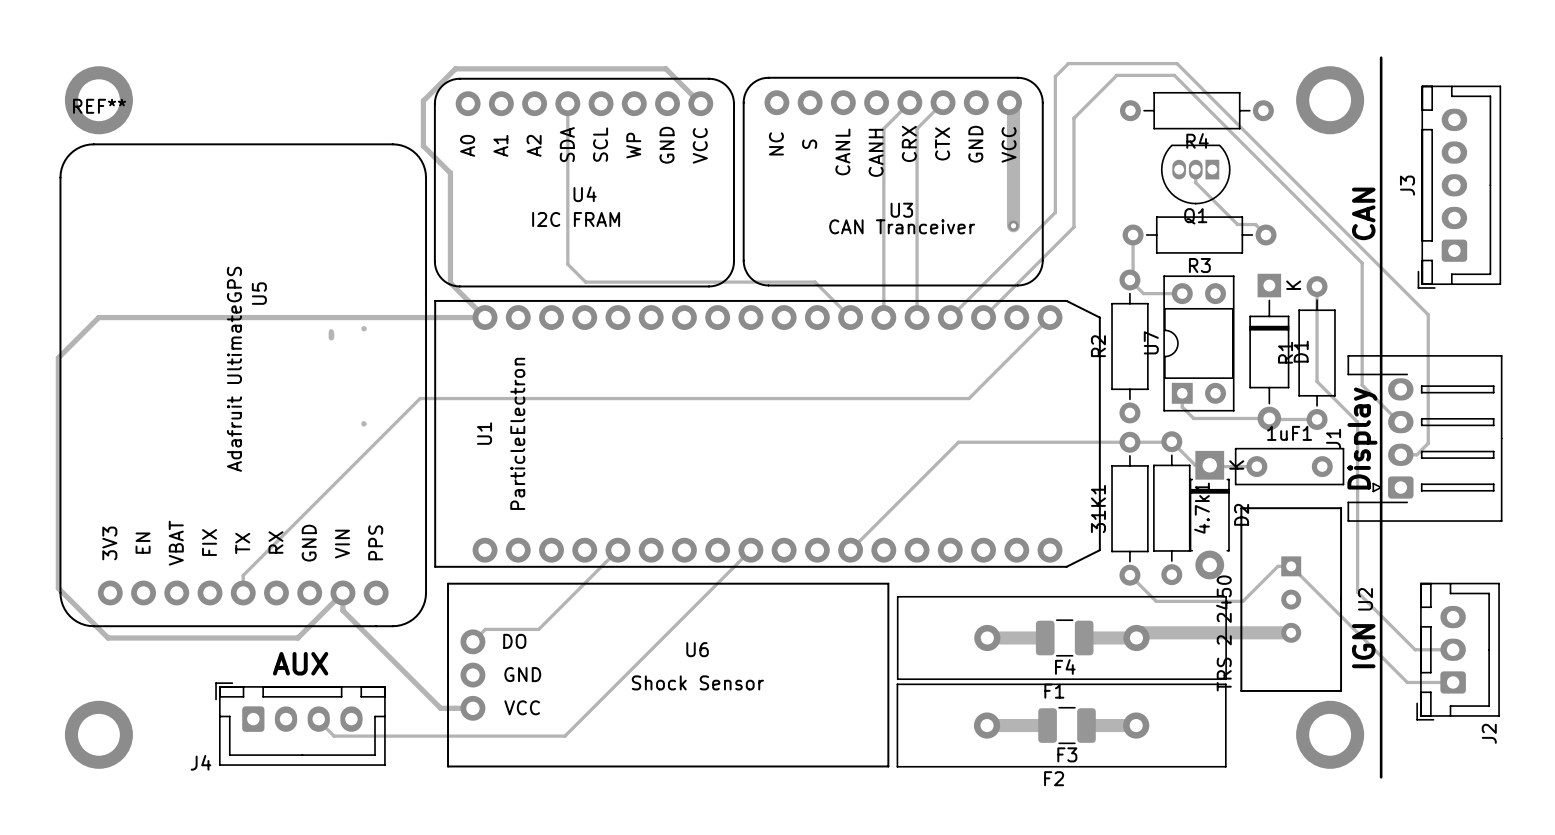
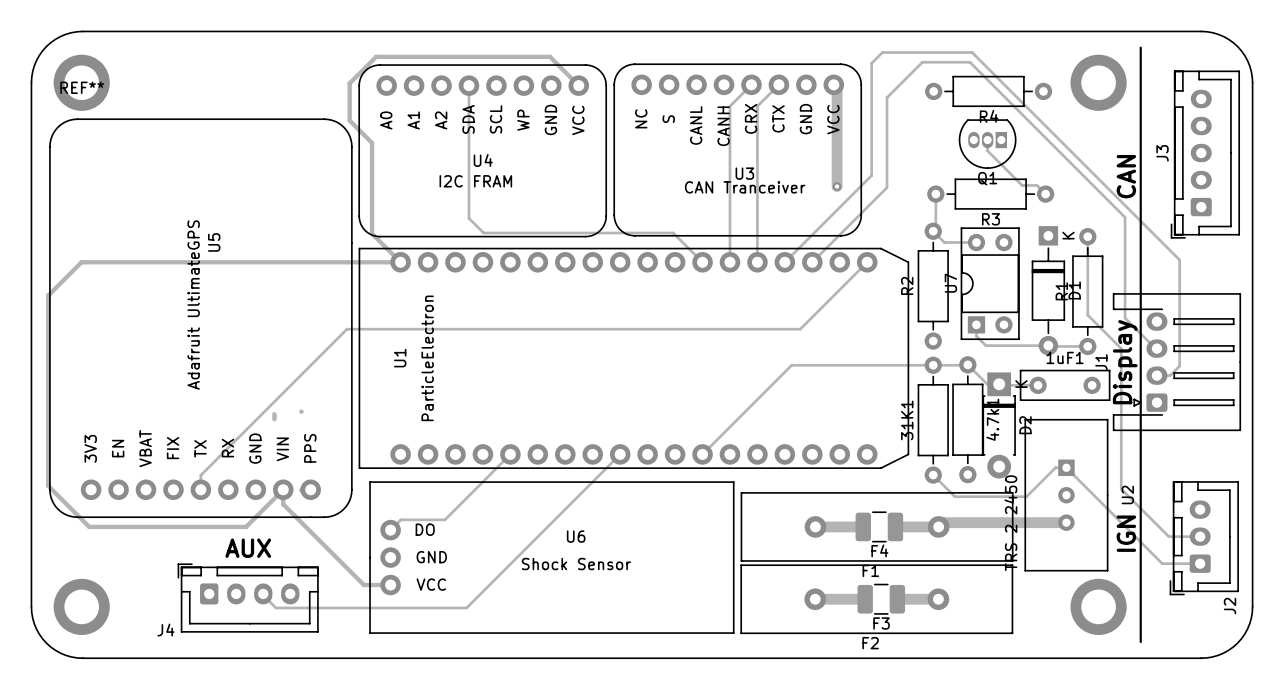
board edge: none -> (82, 31) (1201, 31) (1223, 36) (1233, 42) (1244, 55) (1251, 71) (1252, 82) (1252, 606) (1247, 629) (1241, 638) (1228, 650) (1218, 655) (1201, 658) (82, 658) (60, 653) (50, 647) (39, 634) (34, 623) (31, 606) (31, 82) (34, 65) (46, 46) (60, 36) (82, 31)
drawing position: (347, 376) -> (287, 451)

